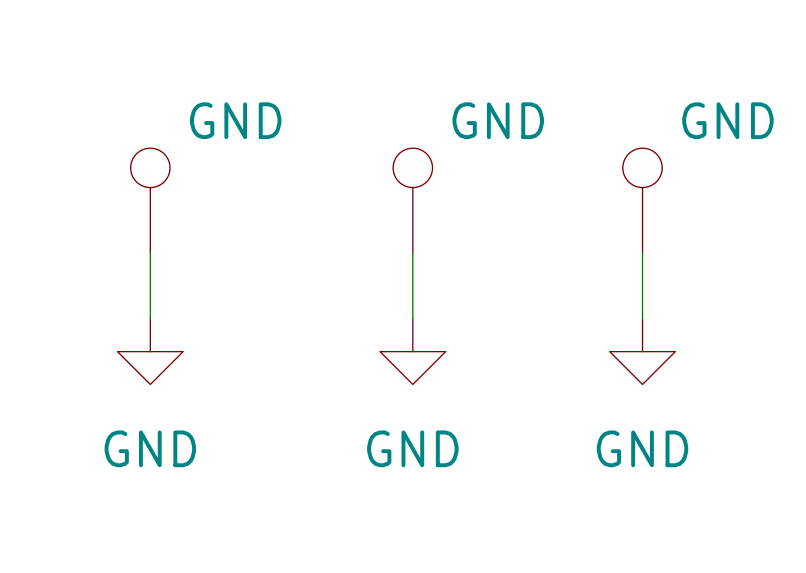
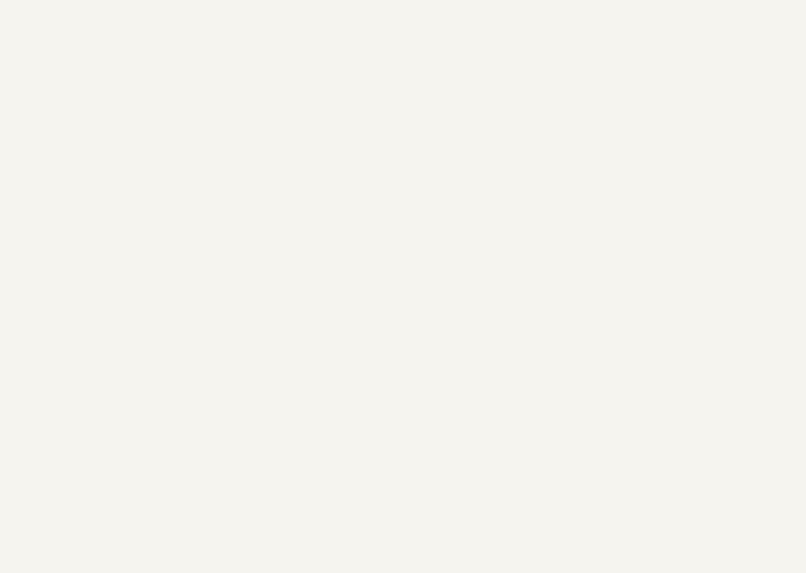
part: GND (150, 200) -> none
part: GND (412, 200) -> none
part: GND (642, 200) -> none
wire: (150, 253) (150, 318) -> none
wire: (412, 253) (412, 318) -> none
wire: (642, 253) (642, 318) -> none
power symbol: GND (150, 351) -> none
power symbol: GND (412, 351) -> none
power symbol: GND (642, 351) -> none

